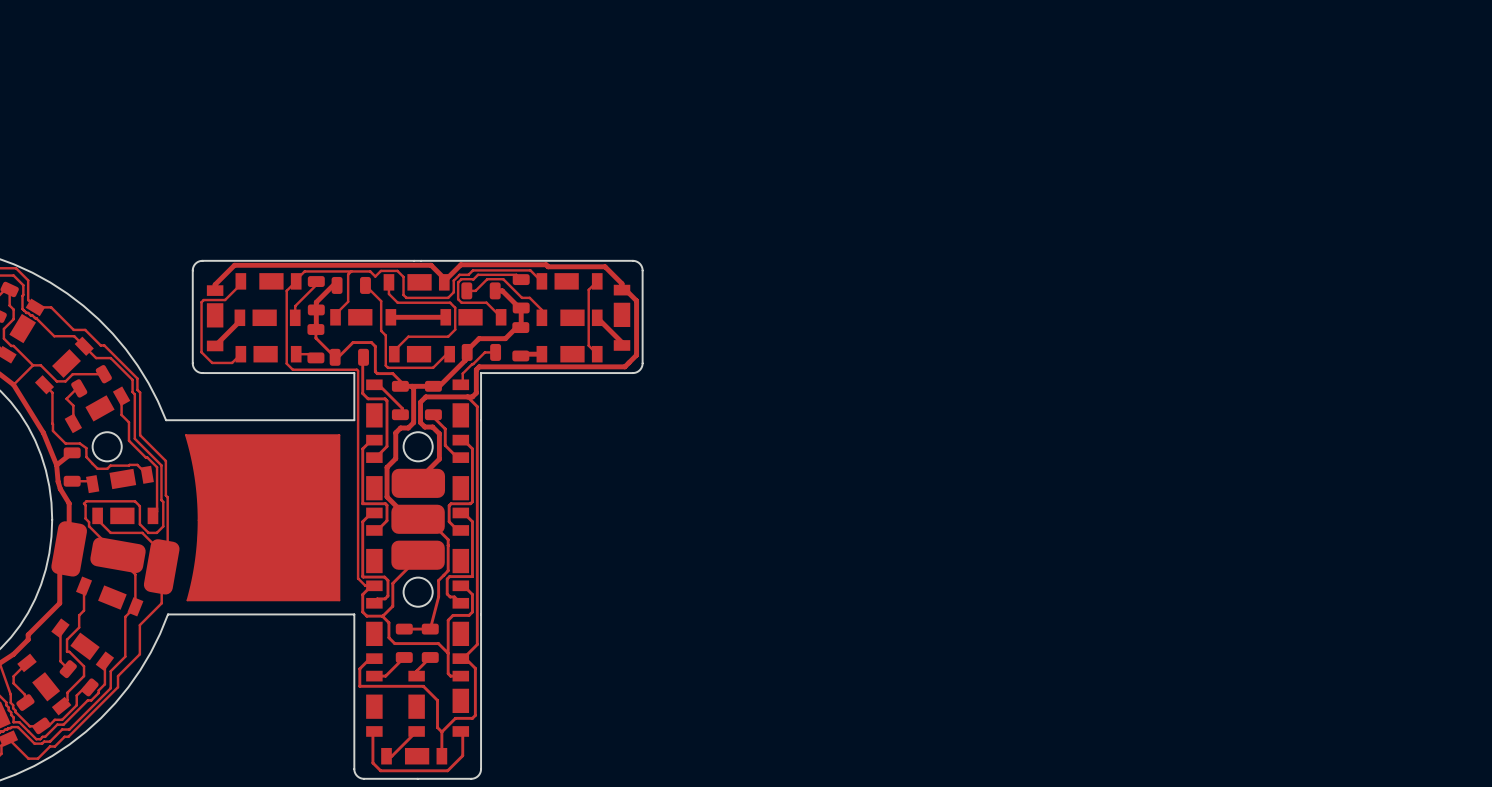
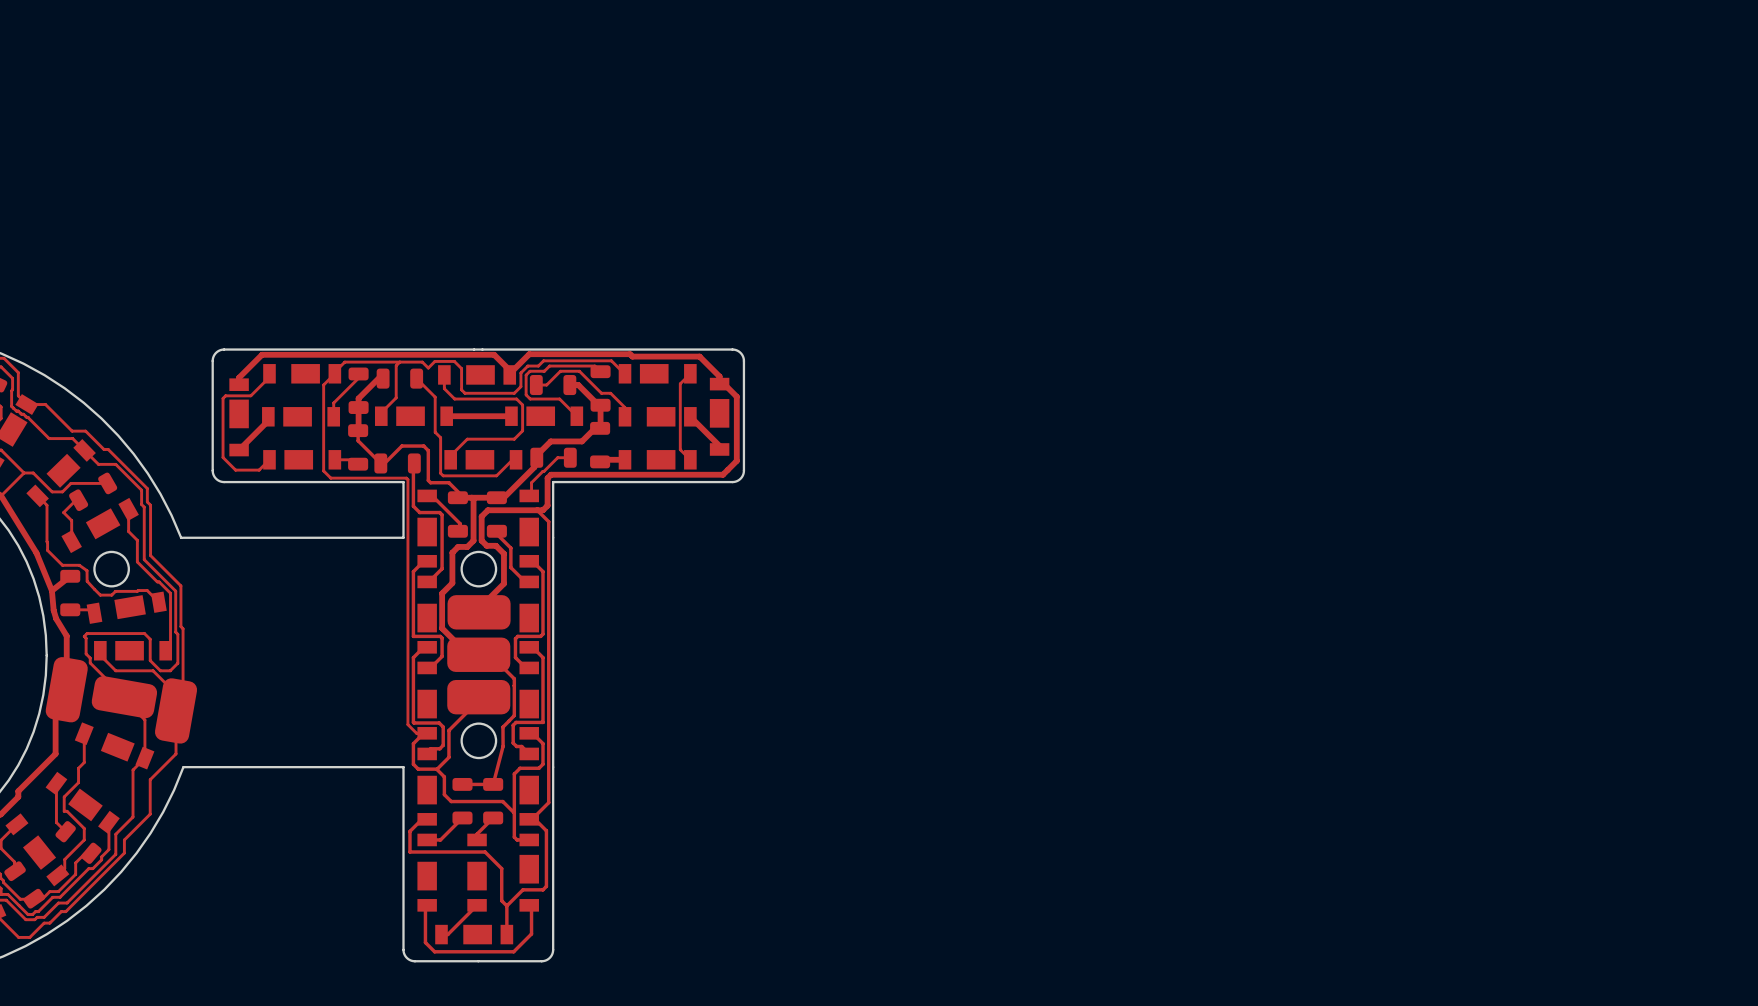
drawing: [186, 435, 340, 601] -> none
top track: (339, 435) (186, 435) (195, 477) (198, 514) (196, 555) (187, 600) (339, 600) (339, 435) -> none

